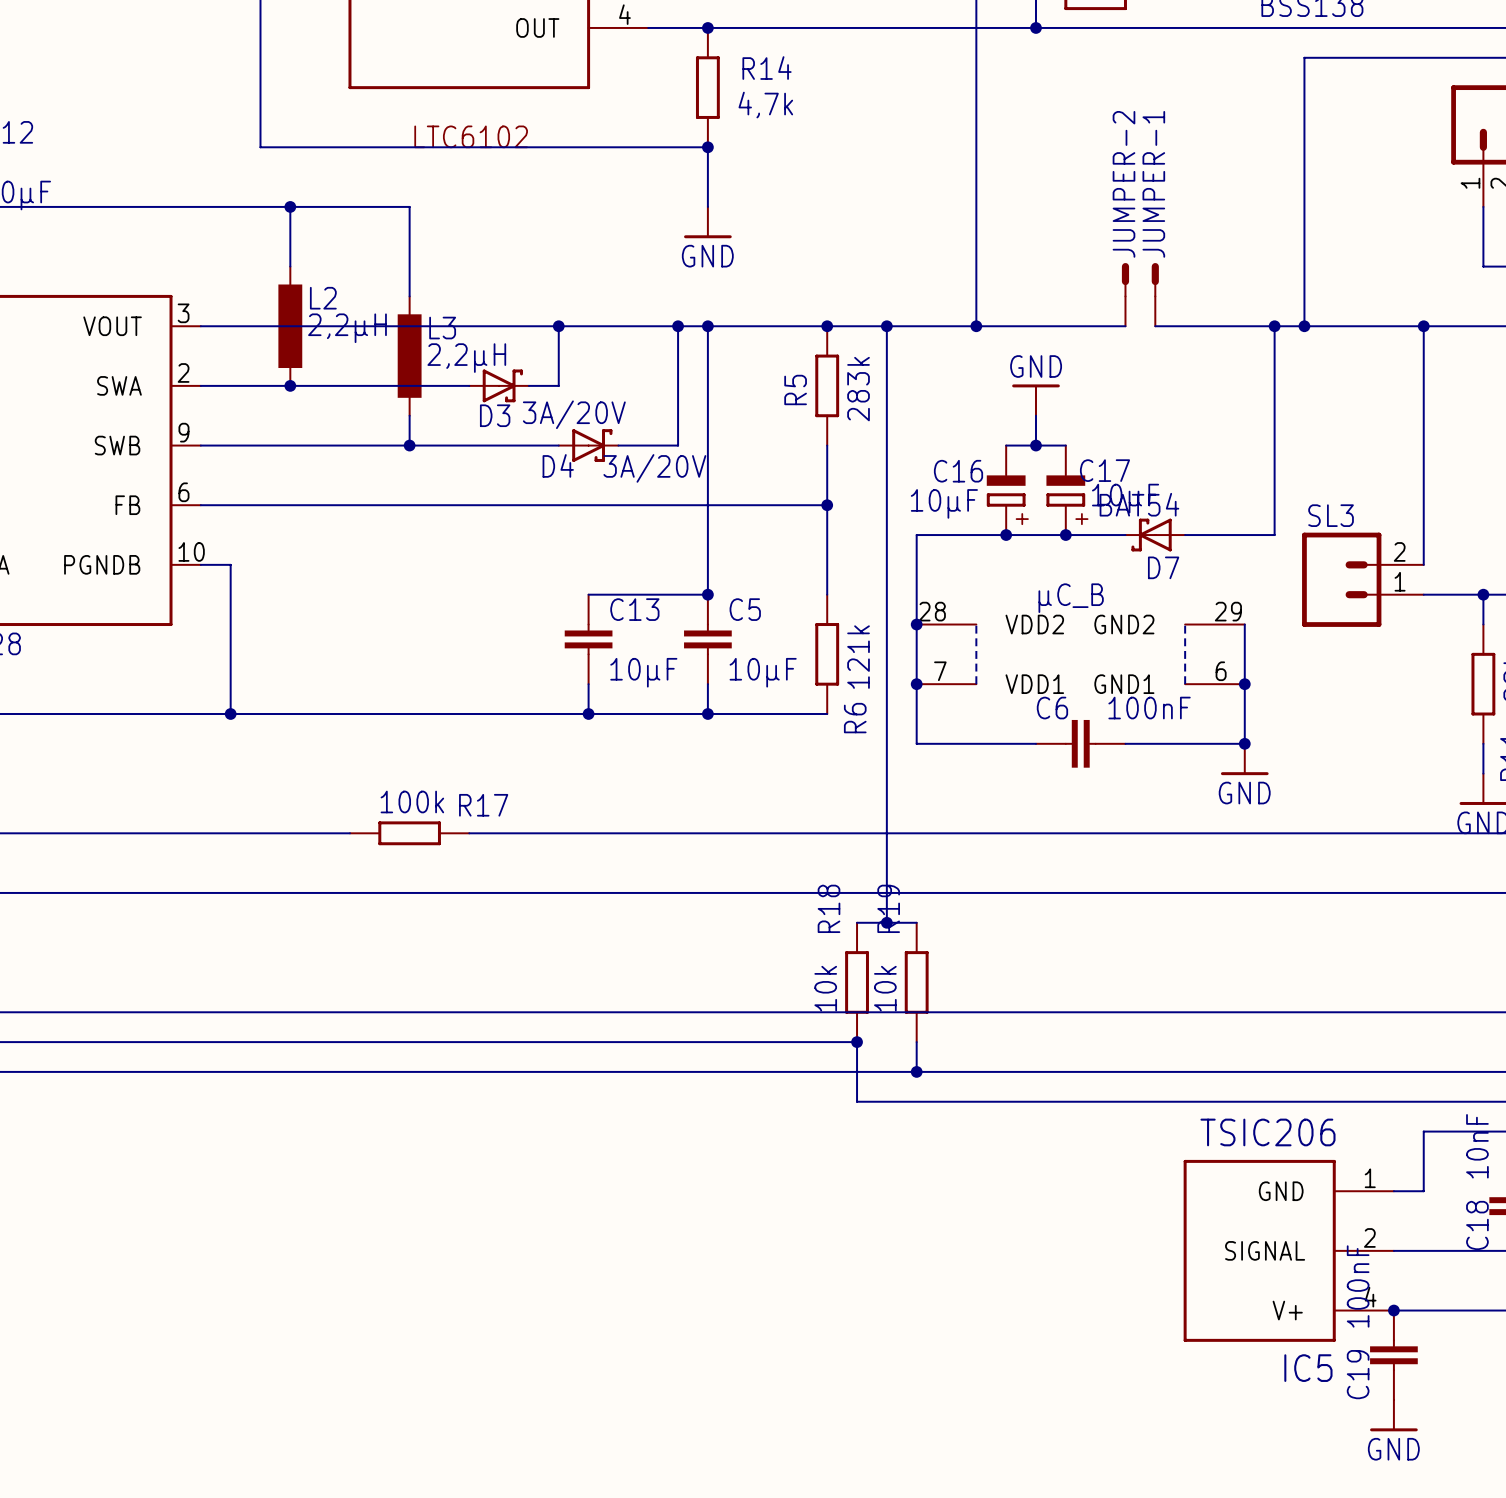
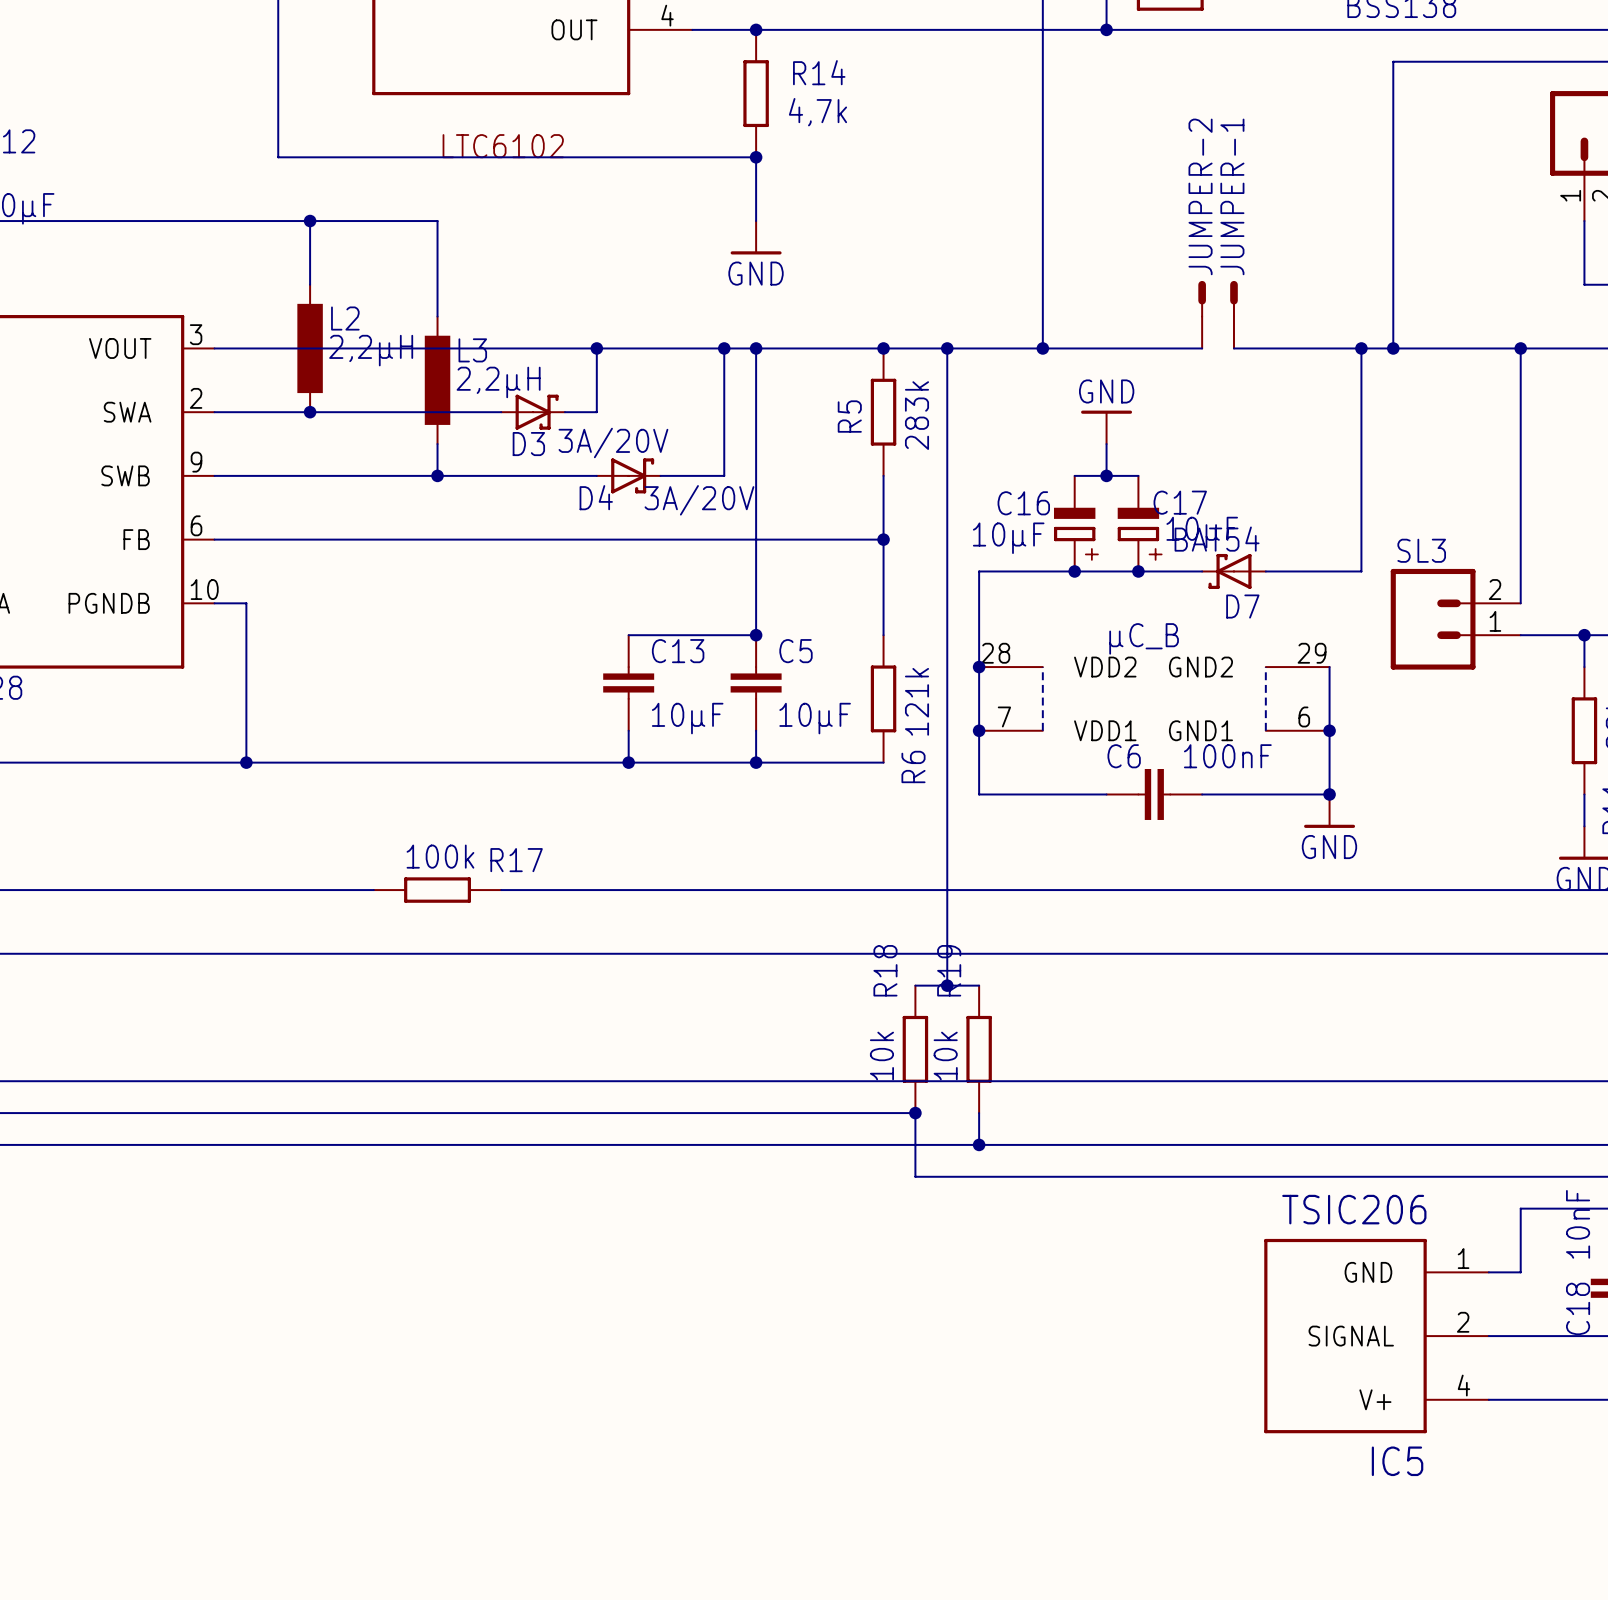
junction: (1393, 1310) -> none
C19: 100nF (1393, 1355) -> none
power symbol: GND (1393, 1415) -> none

